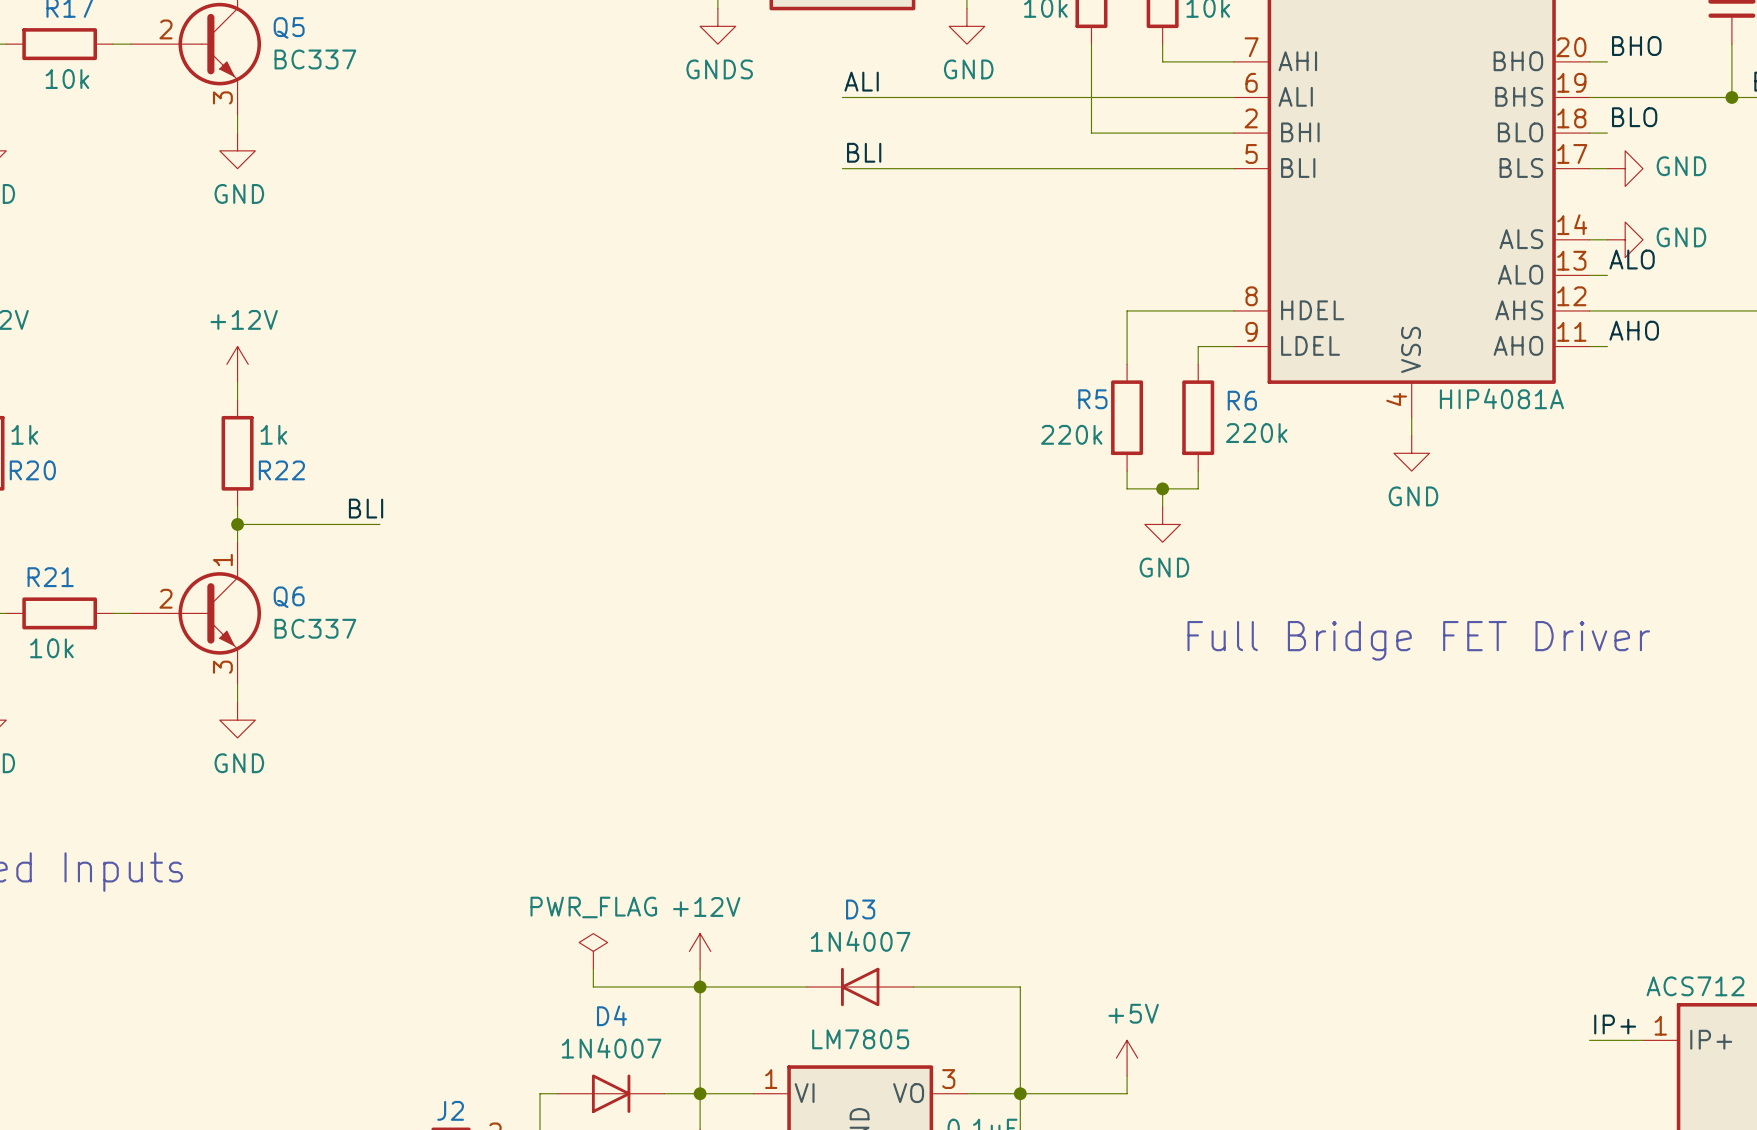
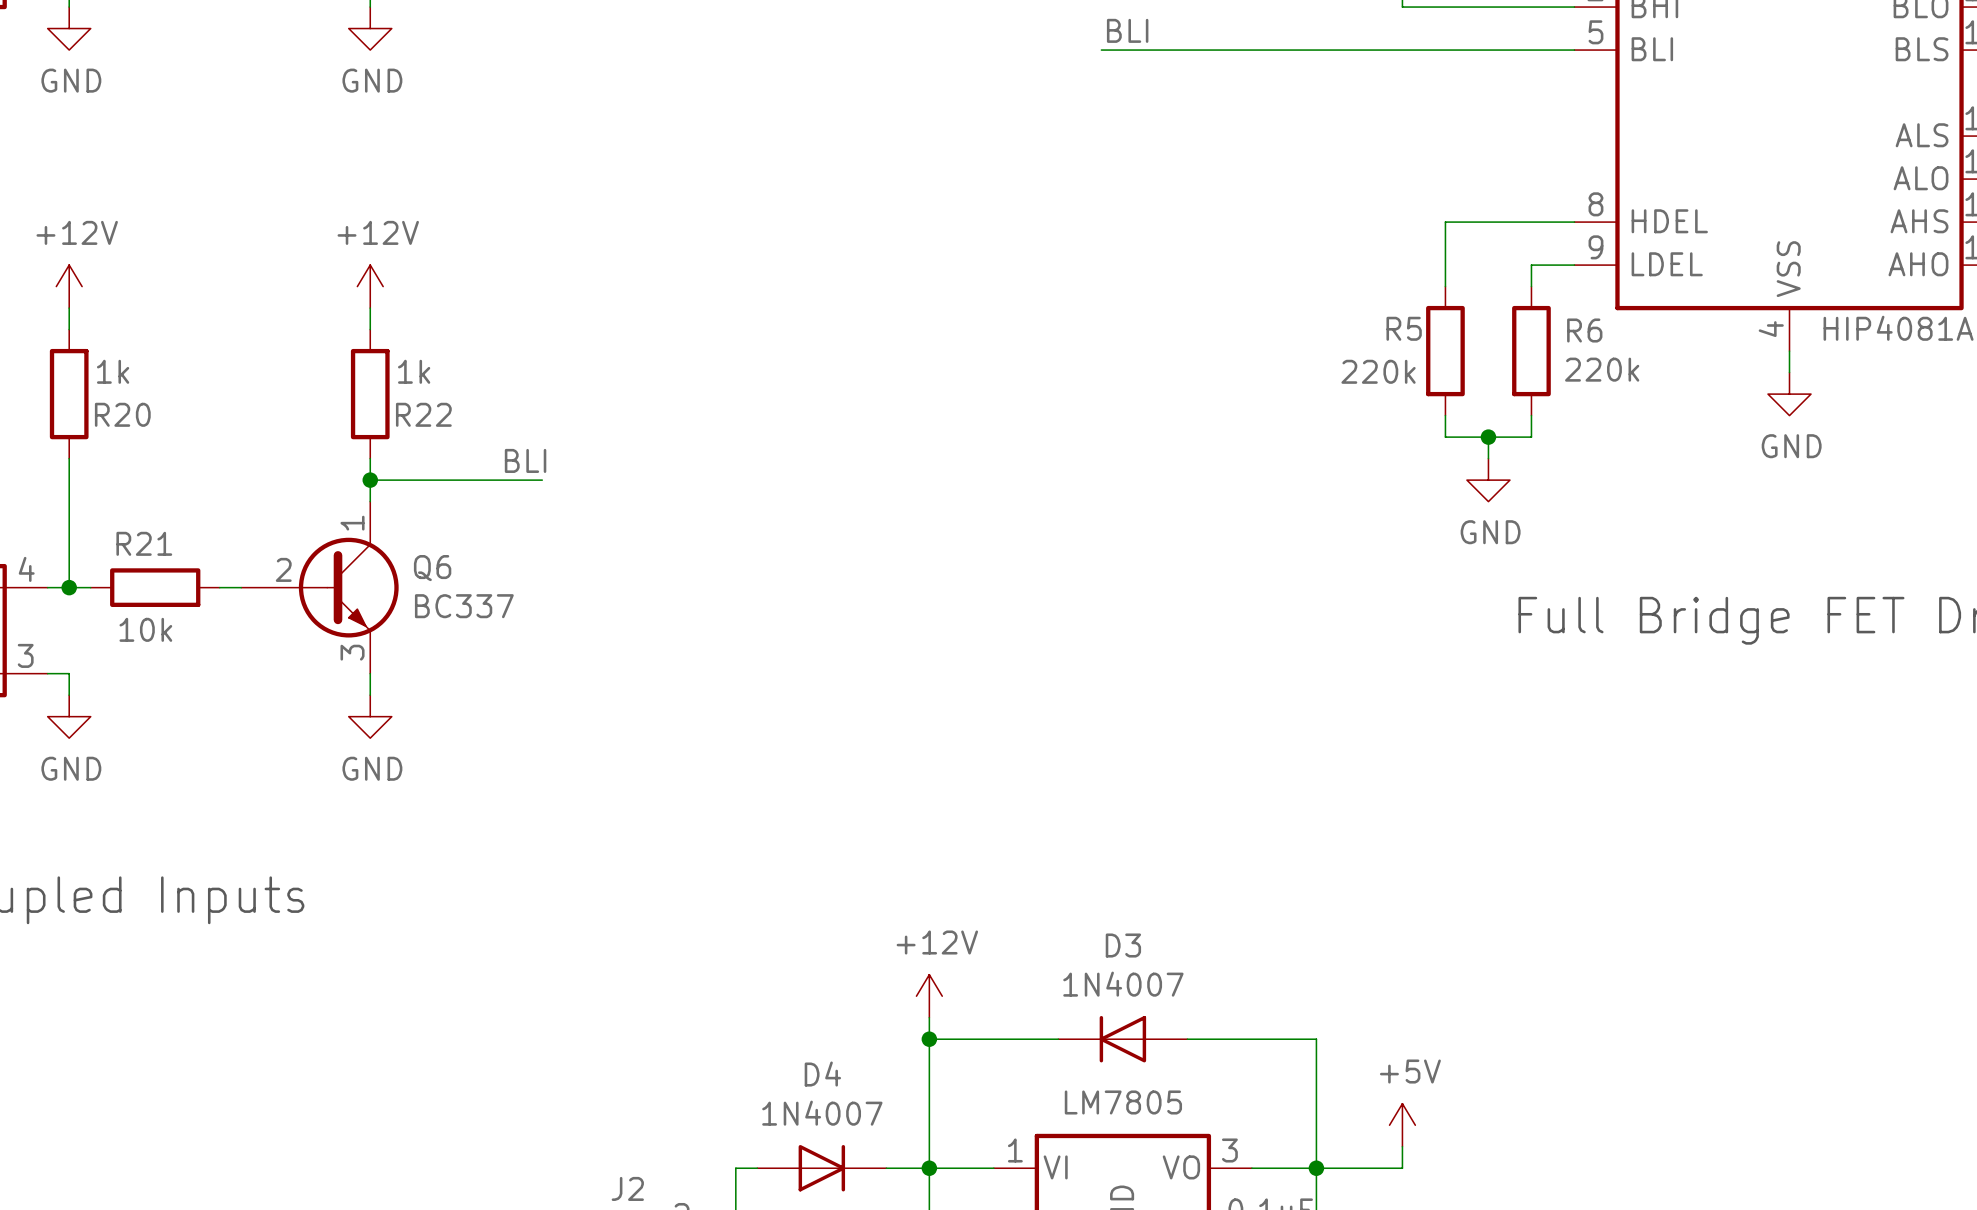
power symbol: PWR_FLAG (593, 951) -> none
wire: (593, 969) (593, 986) (700, 986) -> none
power symbol position: +5V (1127, 1058) -> +5V (1402, 1125)
wire: (1127, 1075) (1127, 1093) (1091, 1093) -> (1402, 1146) (1402, 1168)

